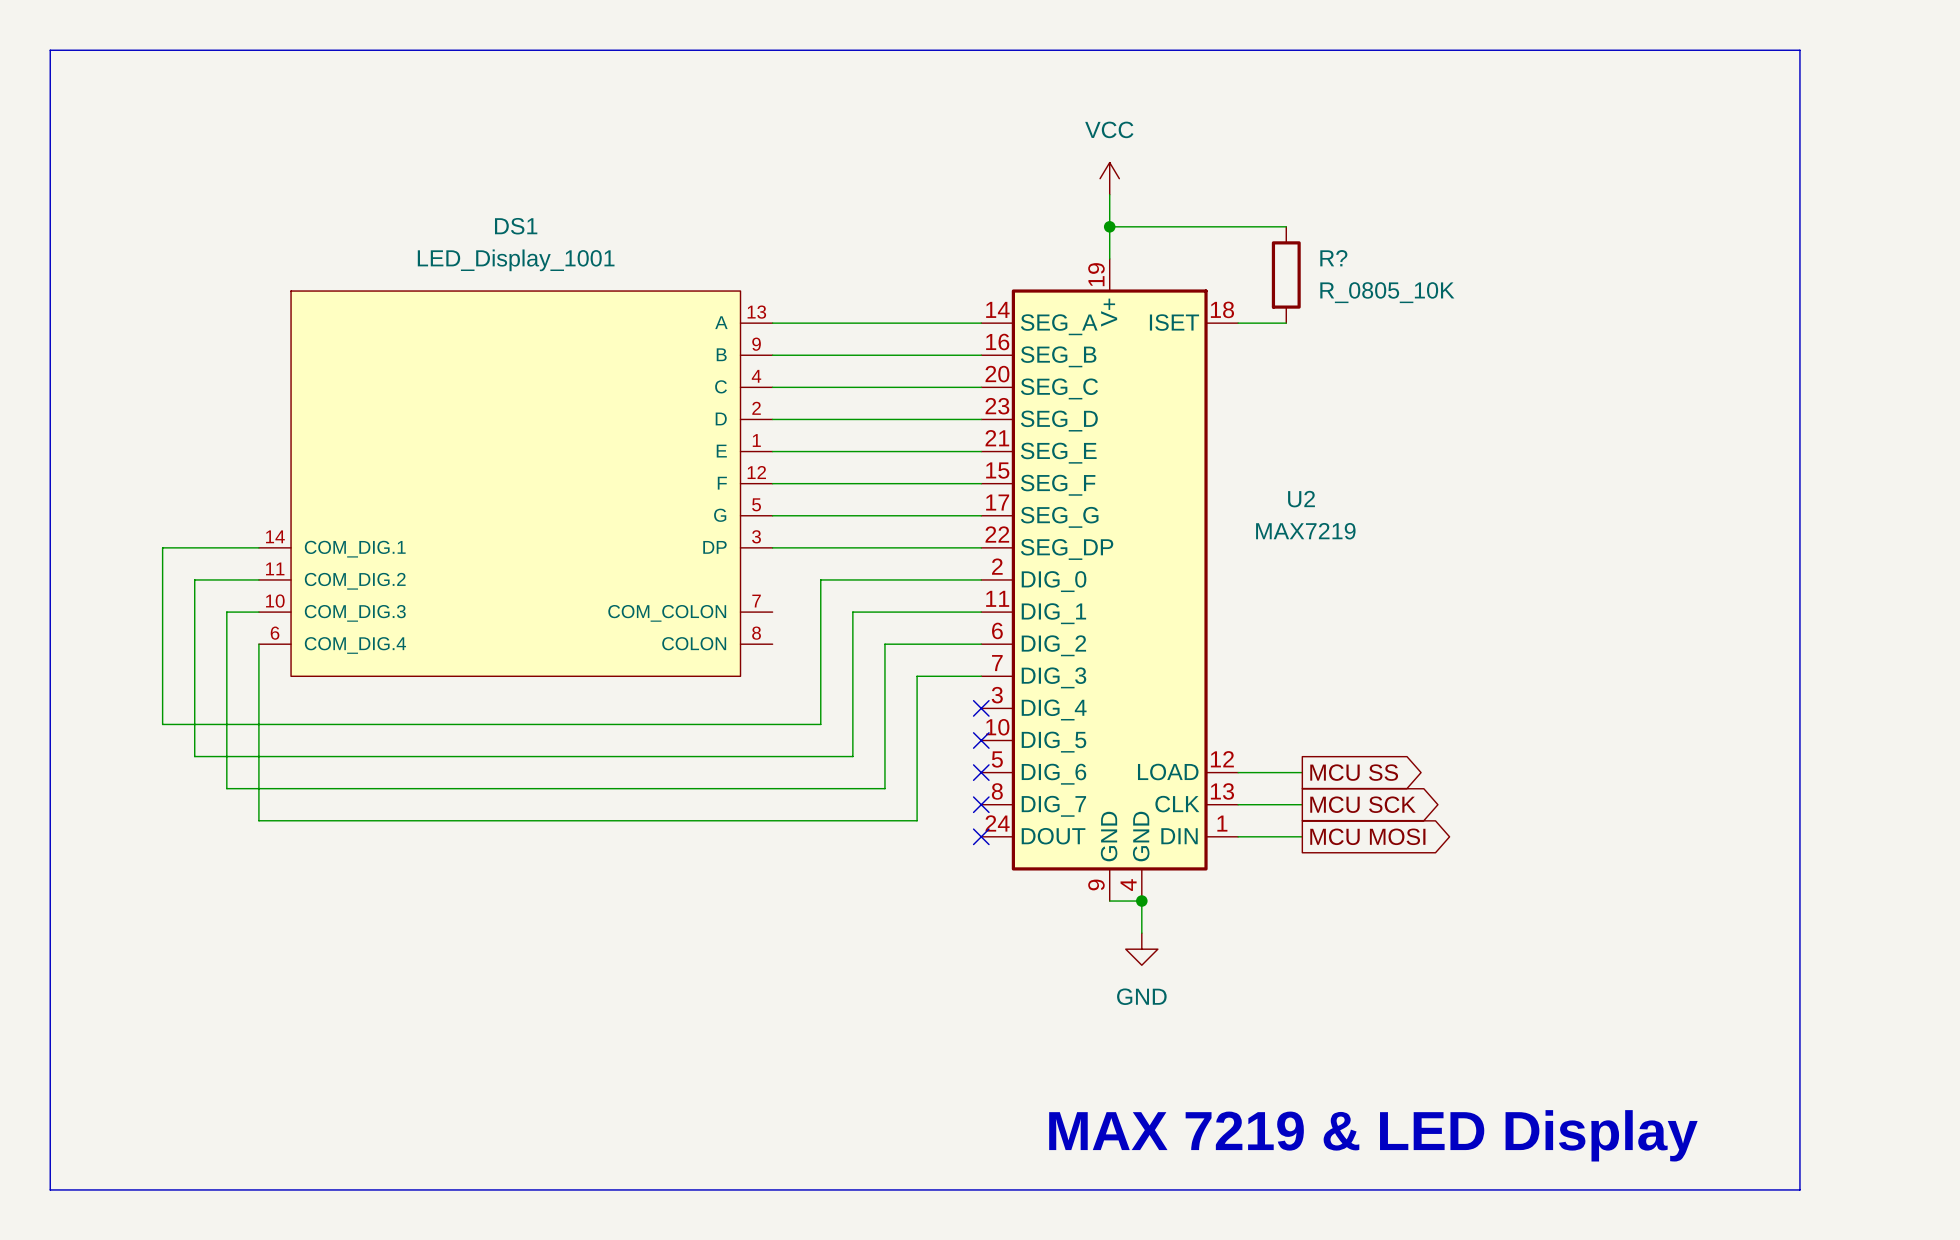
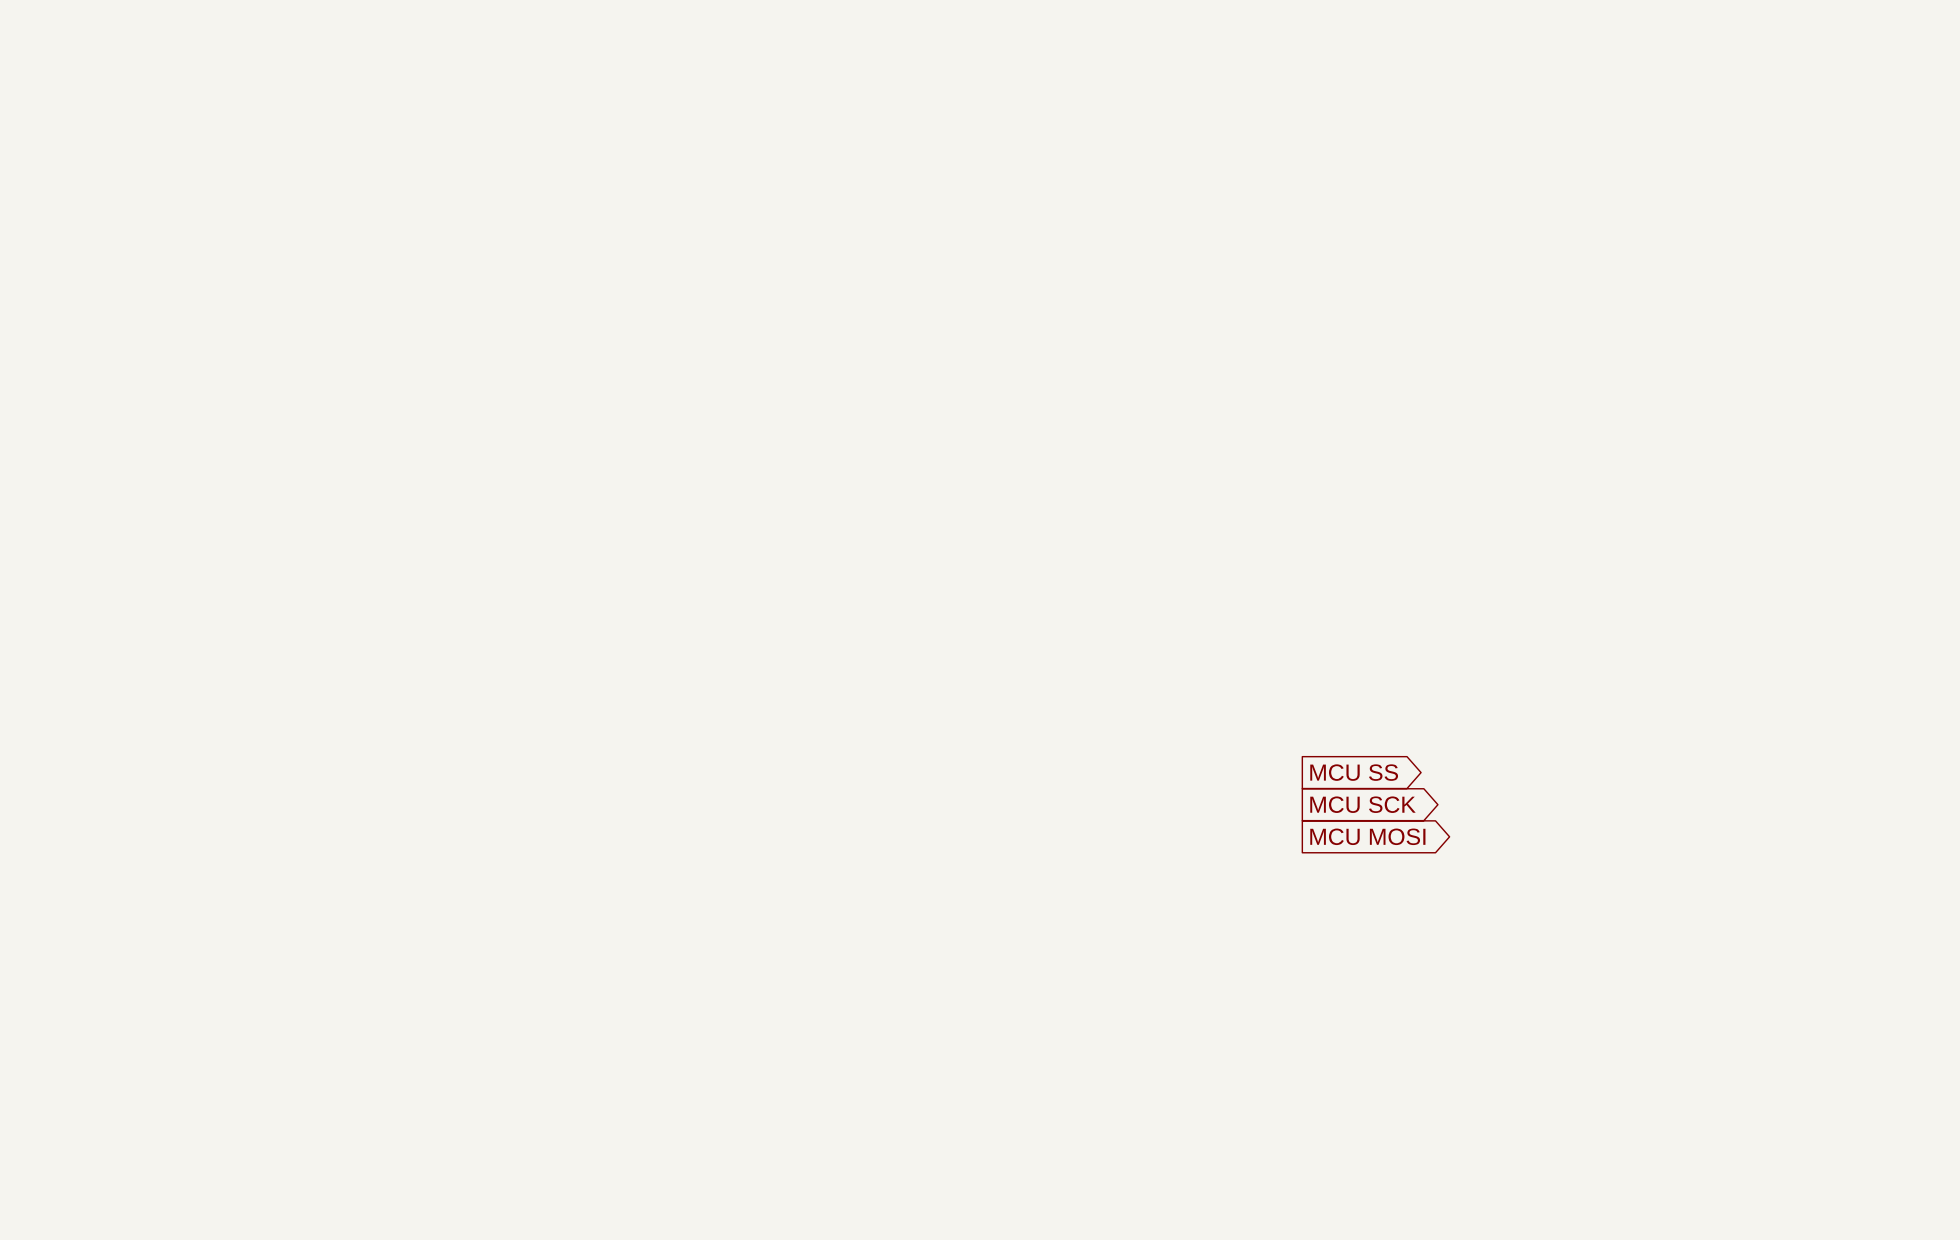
line: (50, 50) (50, 1189) (1799, 1189) (1799, 50) (50, 50) -> none
power symbol: VCC (1109, 178) -> none
wire: (1109, 194) (1109, 258) -> none
wire: (1109, 226) (1286, 226) -> none
junction: (1109, 226) -> none
R?: R_0805_10K (1286, 274) -> none
wire: (772, 323) (981, 323) -> none
wire: (1238, 323) (1286, 323) -> none
wire: (772, 355) (981, 355) -> none
wire: (772, 387) (981, 387) -> none
wire: (772, 419) (981, 419) -> none
wire: (772, 451) (981, 451) -> none
DS1: LED_Display_1001 (515, 483) -> none
wire: (772, 483) (981, 483) -> none
wire: (772, 515) (981, 515) -> none
wire: (258, 547) (162, 547) (162, 724) (820, 724) (820, 579) (981, 579) -> none
wire: (772, 547) (981, 547) -> none
wire: (258, 579) (194, 579) (194, 756) (852, 756) (852, 612) (981, 612) -> none
U2: MAX7219 (1109, 579) -> none
wire: (258, 612) (226, 612) (226, 788) (884, 788) (884, 644) (981, 644) -> none
wire: (258, 644) (258, 820) (917, 820) (917, 676) (981, 676) -> none
no-connect mark: (981, 708) -> none
no-connect mark: (981, 740) -> none
no-connect mark: (981, 772) -> none
wire: (1238, 772) (1302, 772) -> none
no-connect mark: (981, 804) -> none
wire: (1238, 804) (1302, 804) -> none
no-connect mark: (981, 836) -> none
wire: (1238, 836) (1302, 836) -> none
wire: (1109, 901) (1141, 901) (1141, 933) -> none
junction: (1141, 901) -> none
power symbol: GND (1141, 949) -> none
text: MAX 7219 & LED Display (1373, 1135) -> none

